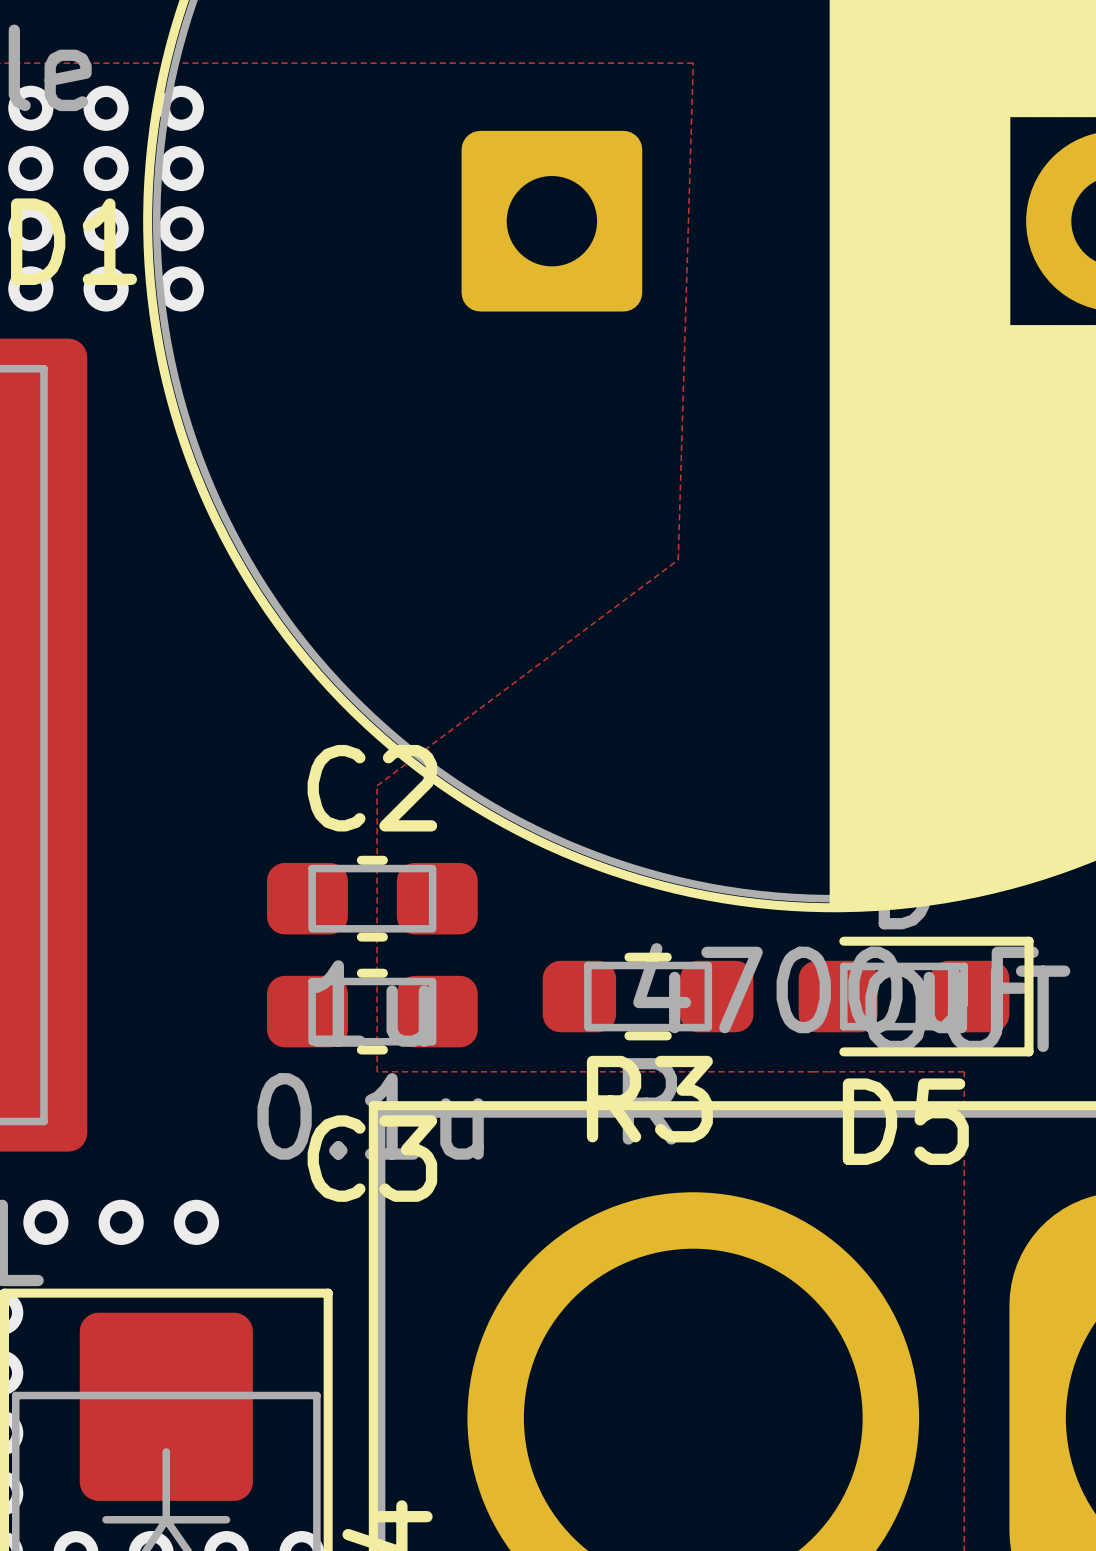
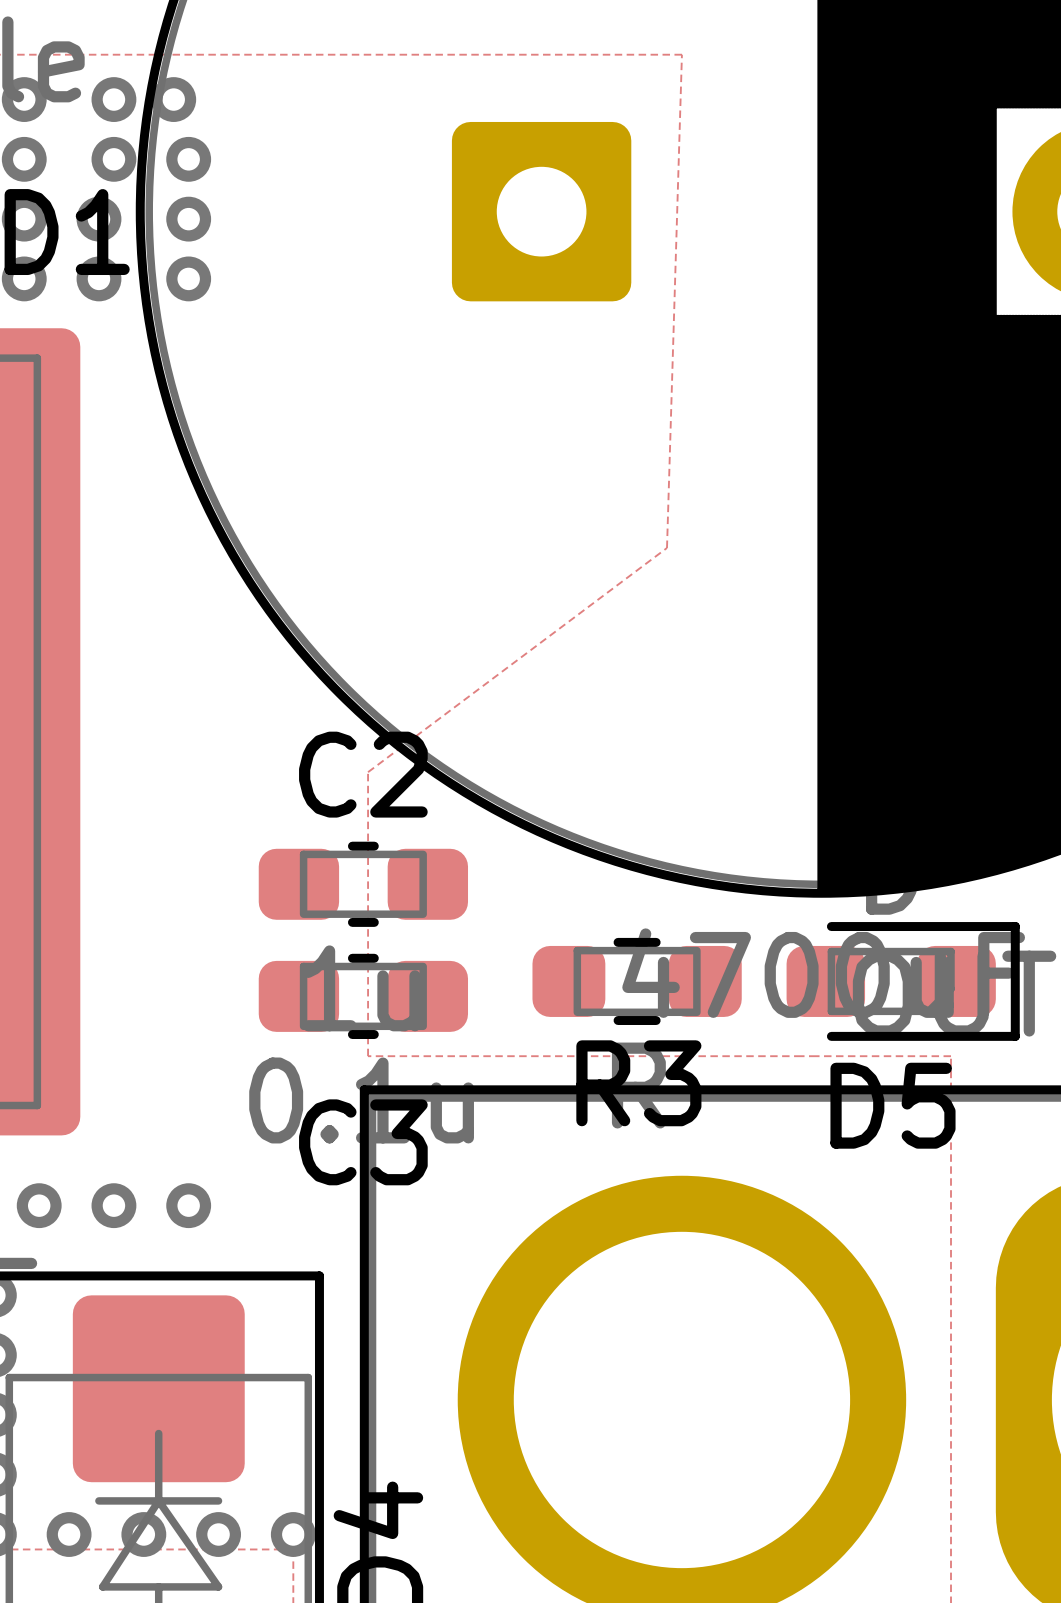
via position: (106, 108) -> (113, 99)
via position: (106, 168) -> (113, 159)
via position: (181, 168) -> (188, 159)
via position: (181, 228) -> (188, 219)
via position: (181, 288) -> (188, 278)

